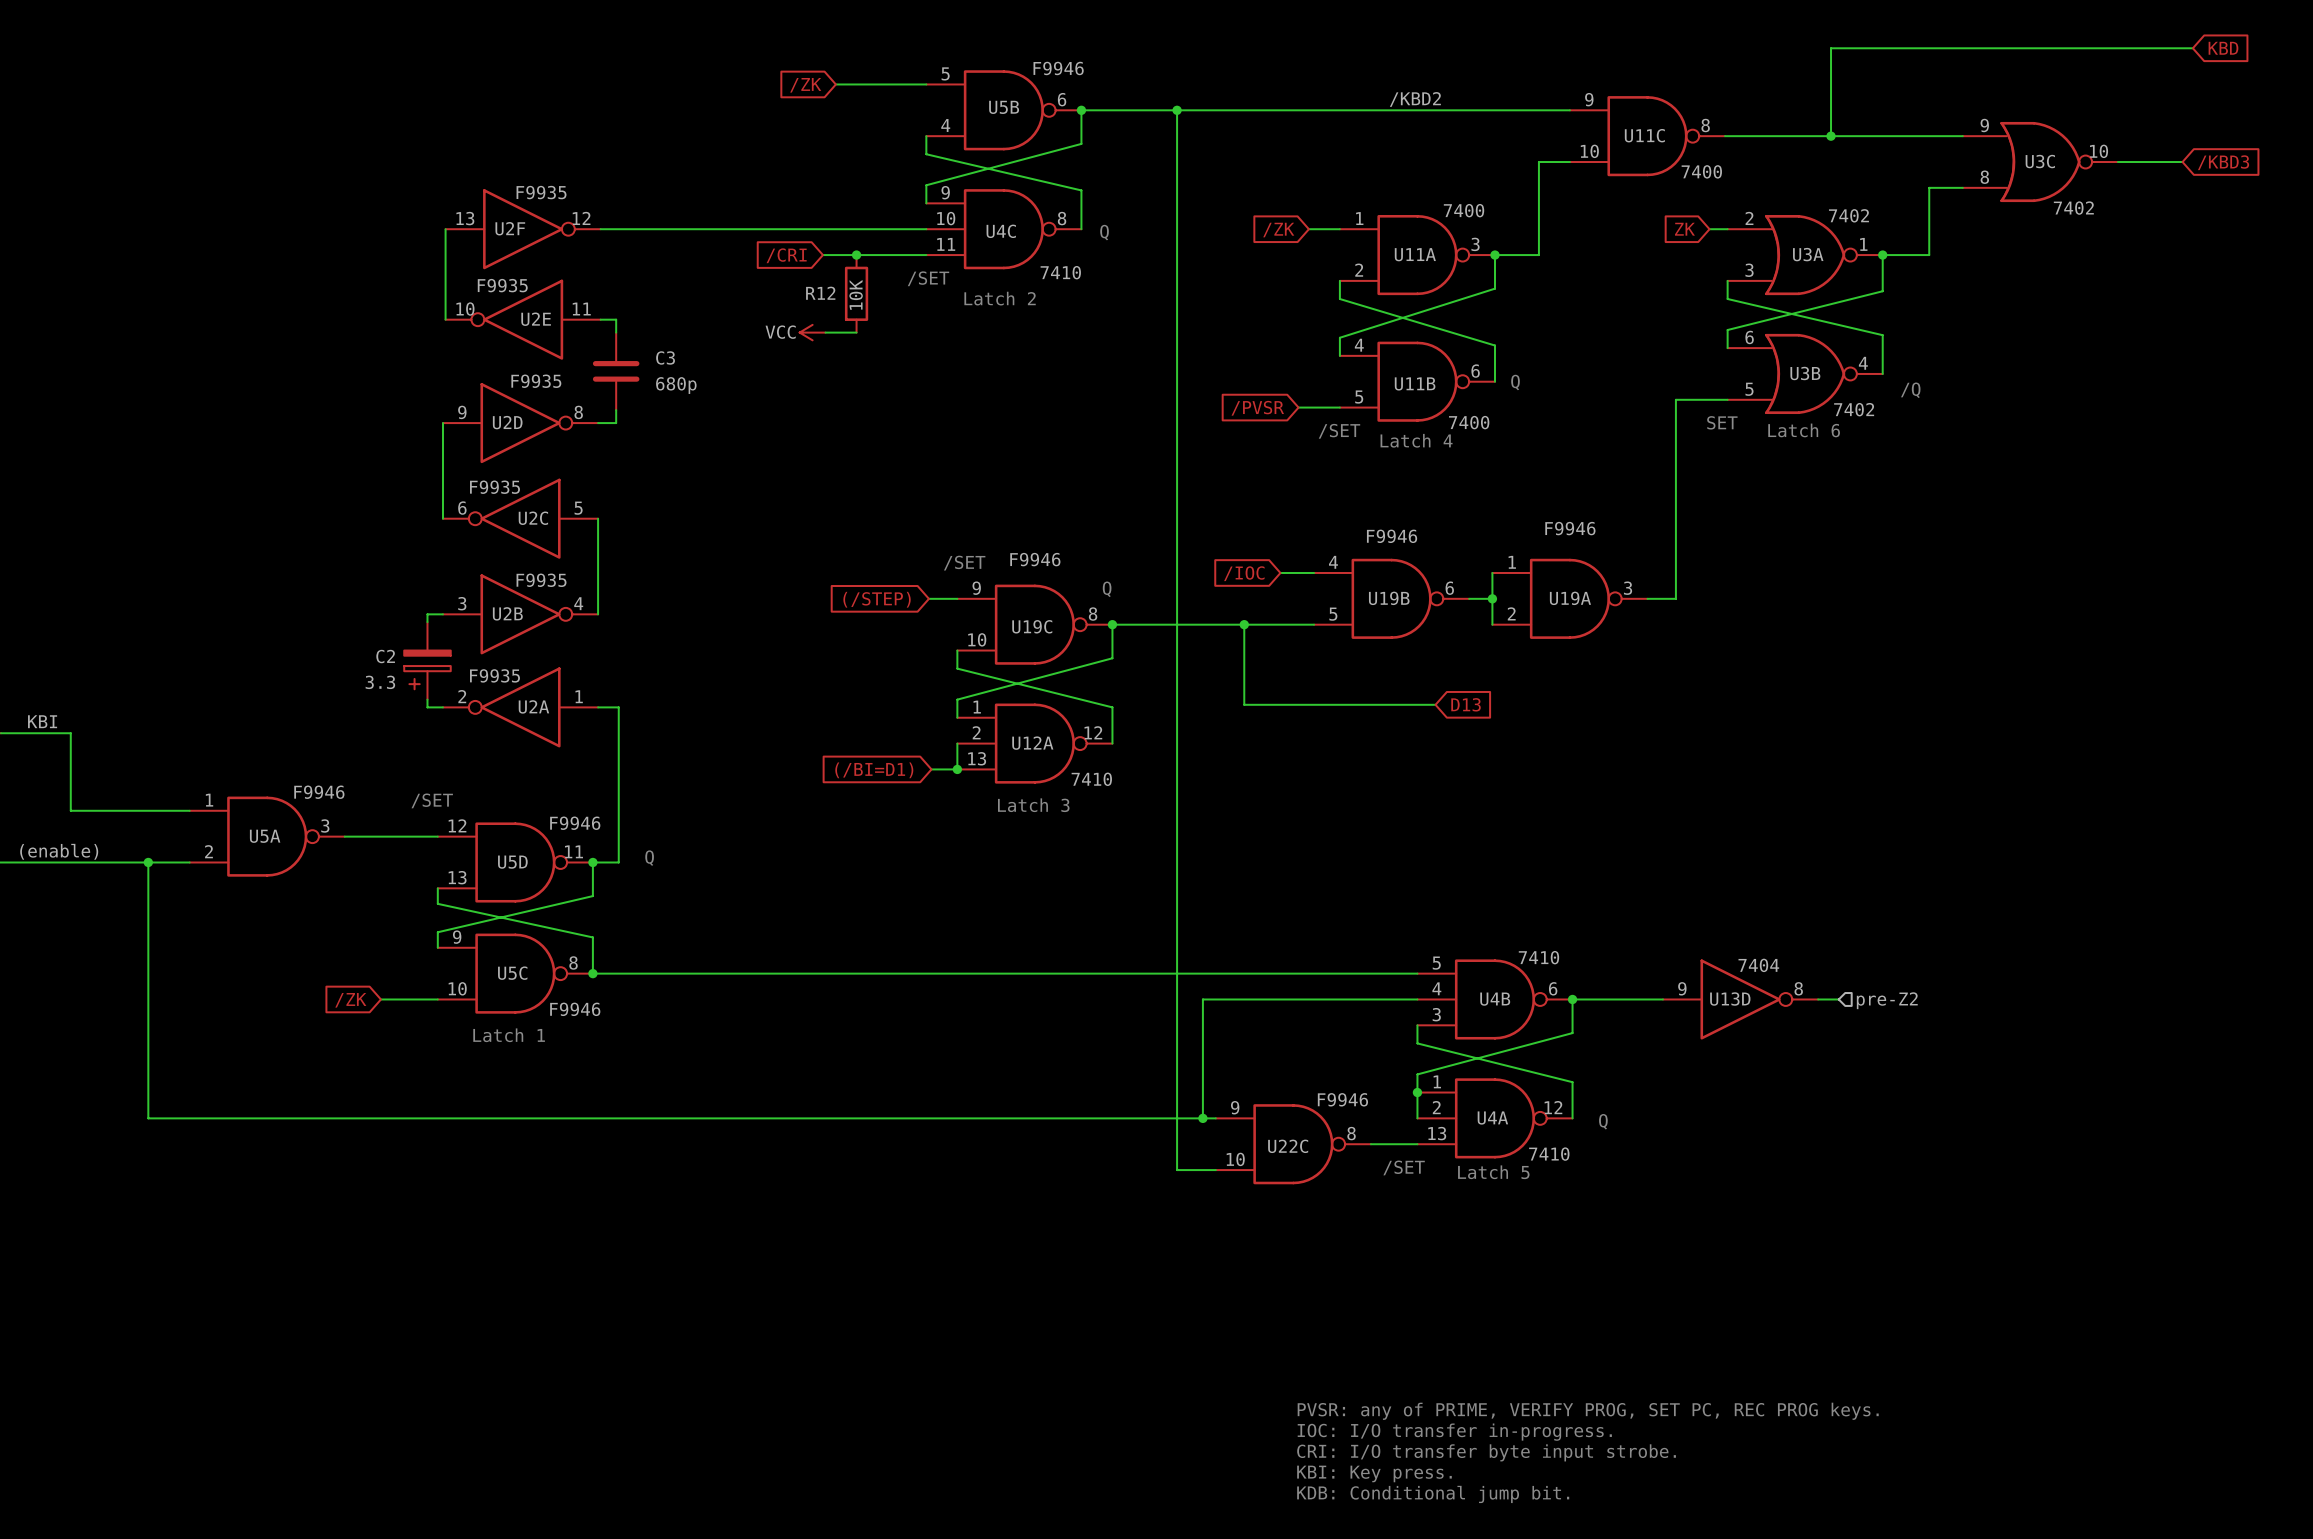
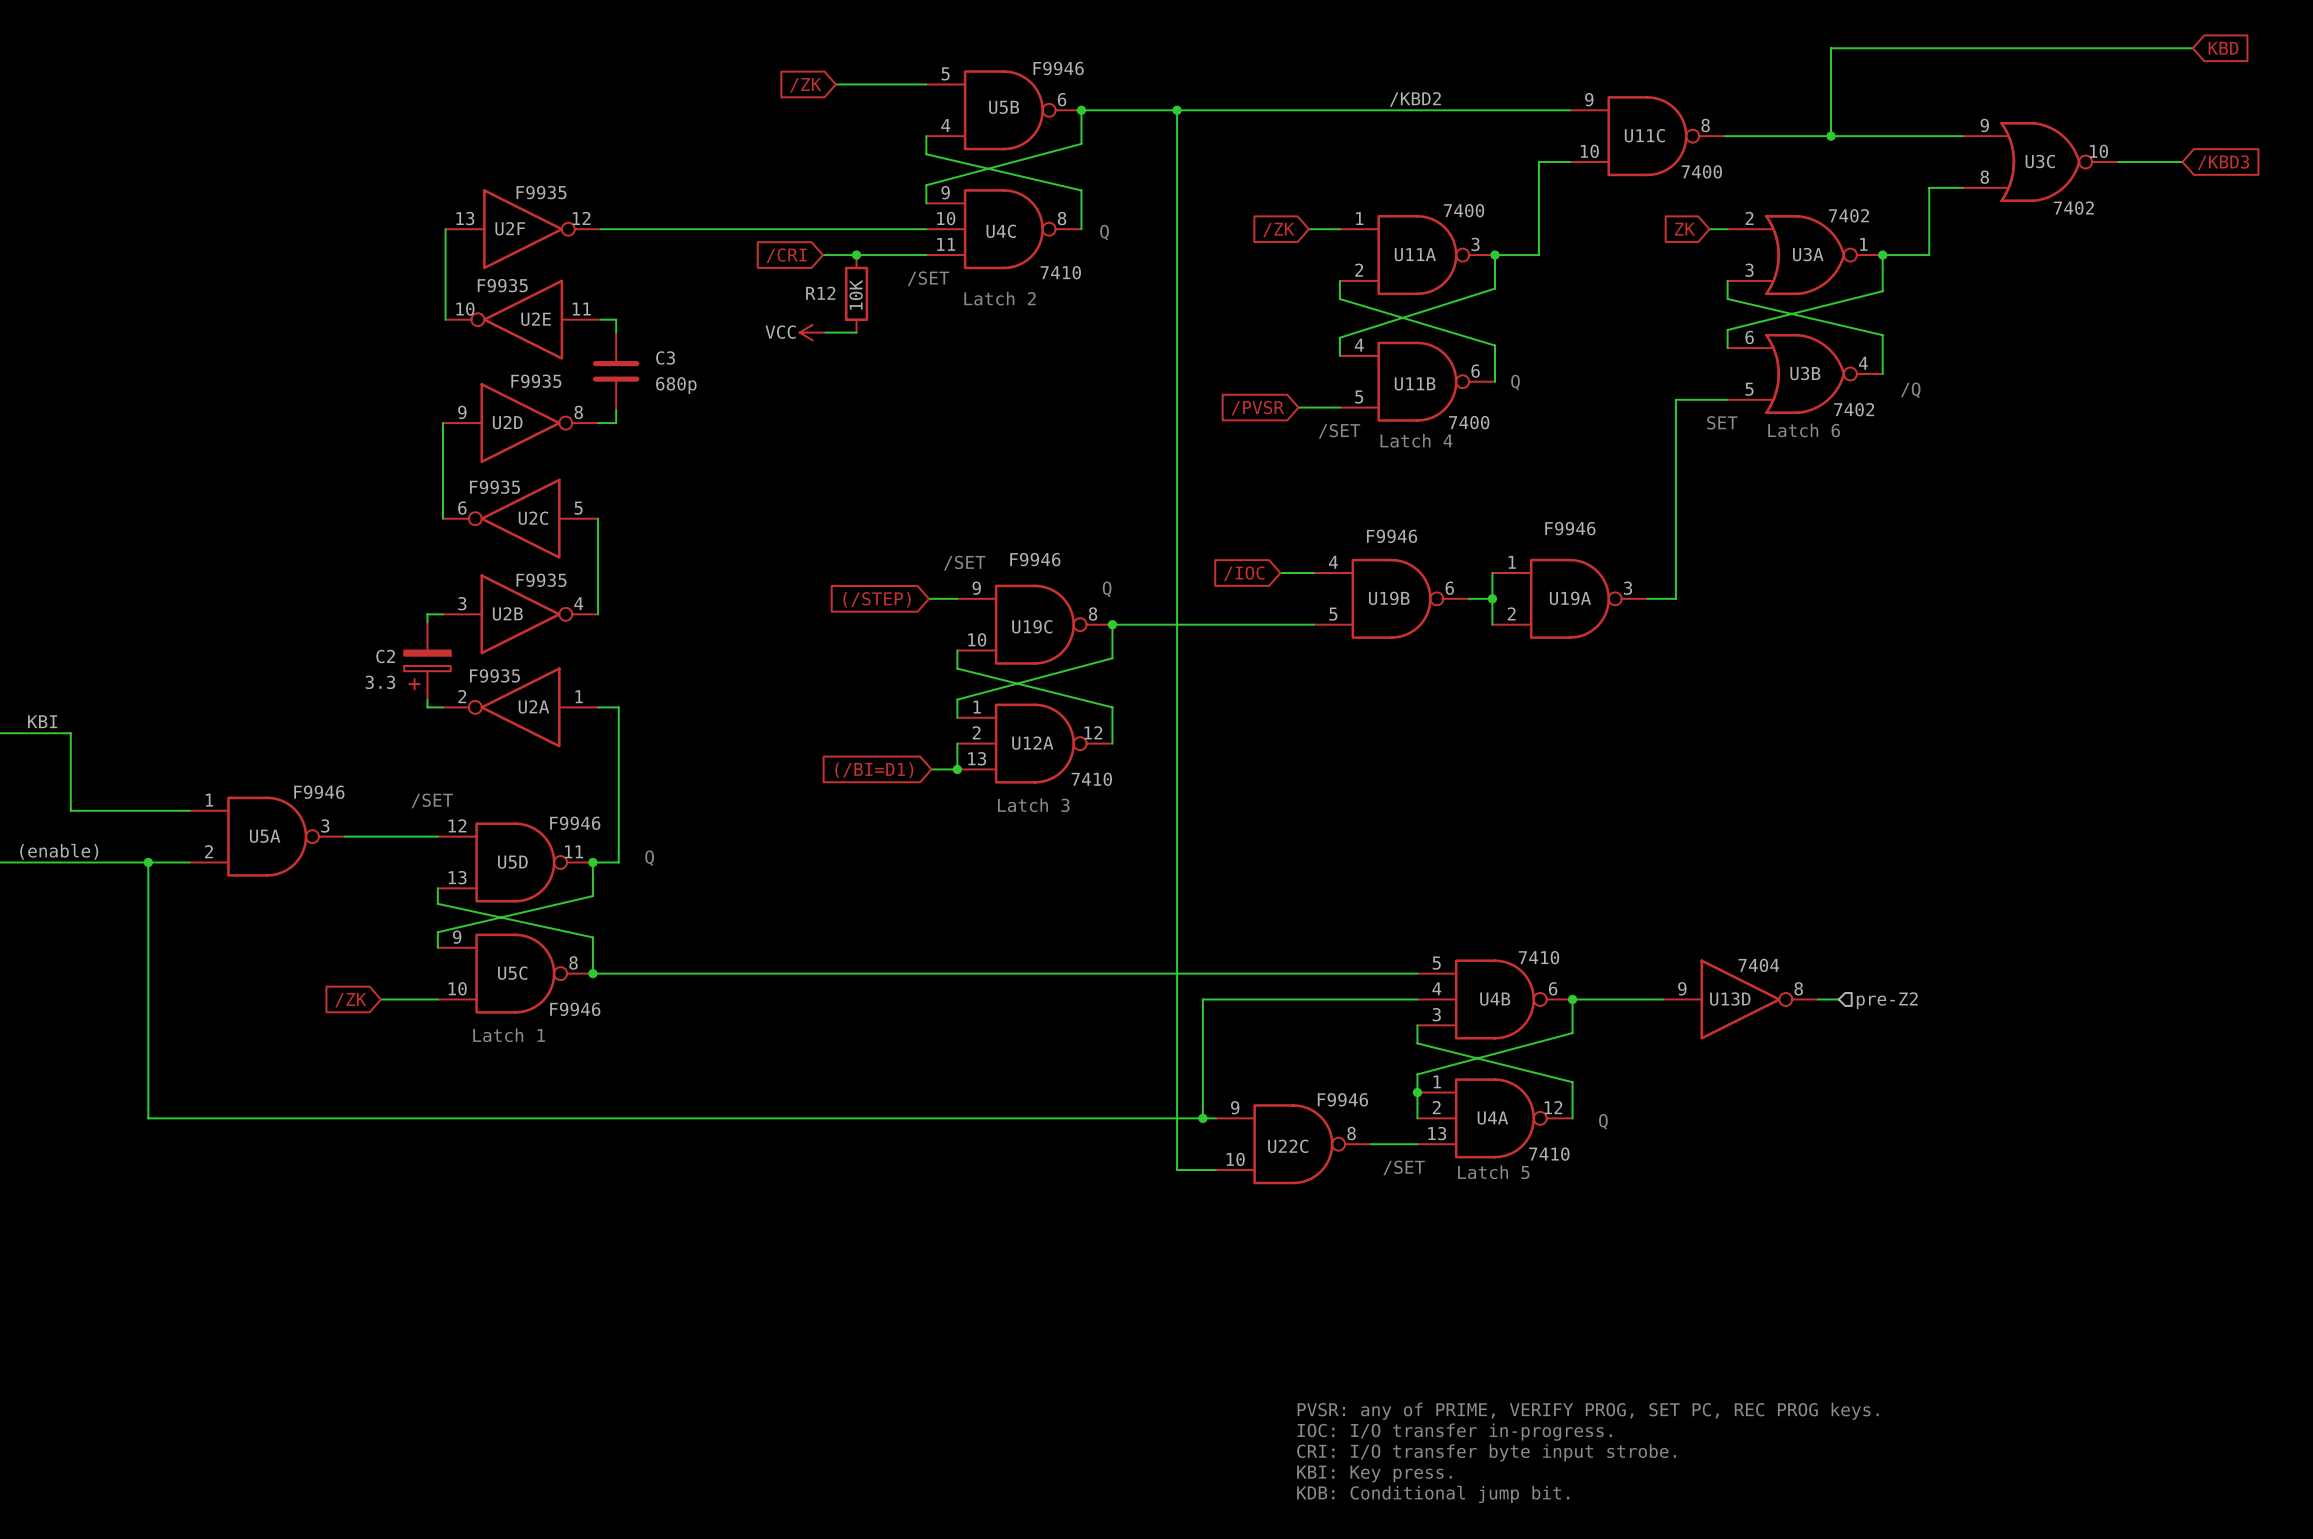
wire: (1244, 624) (1244, 704) (1435, 704) -> none
junction: (1244, 624) -> none
global label: D13 (1466, 704) -> none

